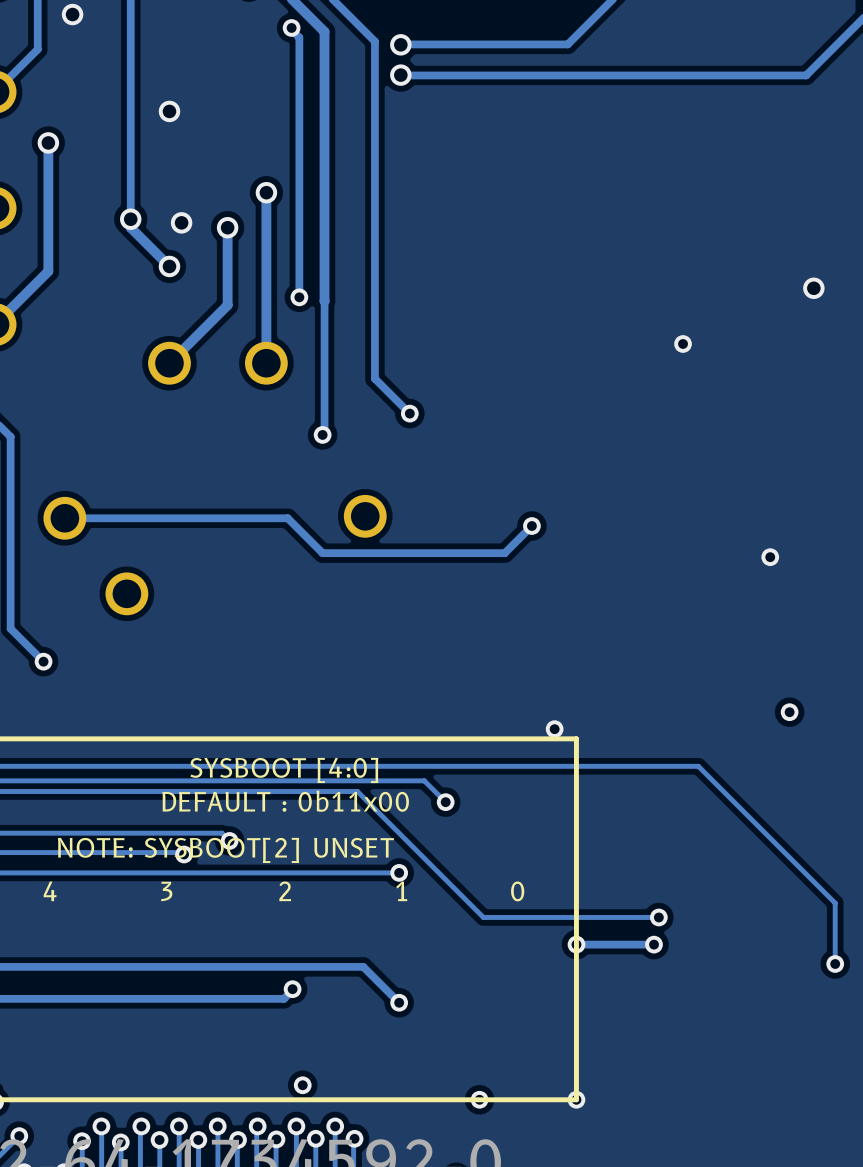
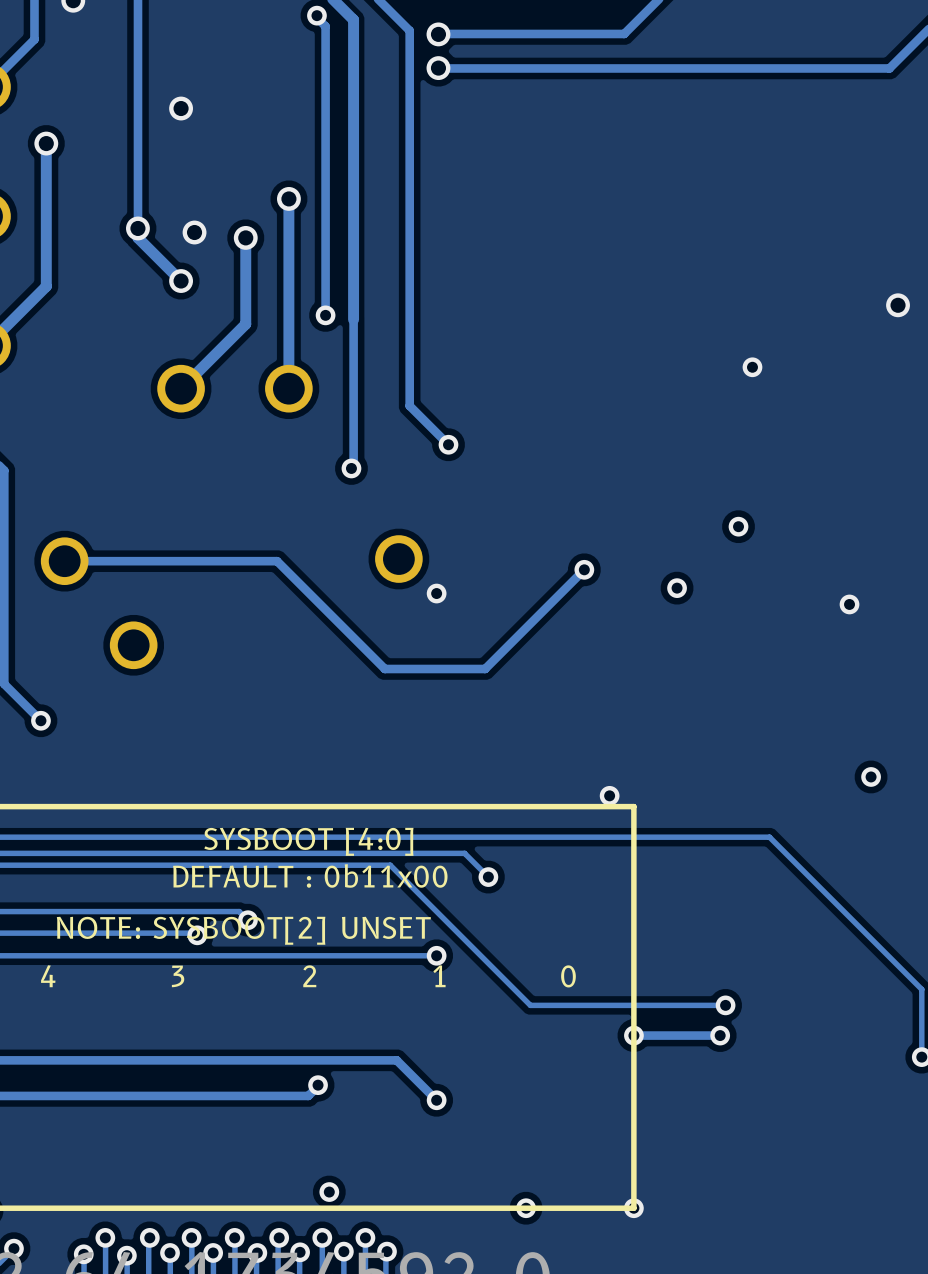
via: none -> (738, 526)
track: (255, 518) (287, 518) (322, 553) (504, 553) -> (277, 561) (384, 669) (485, 669) (554, 600)
via: none -> (677, 588)
via: none -> (436, 593)

